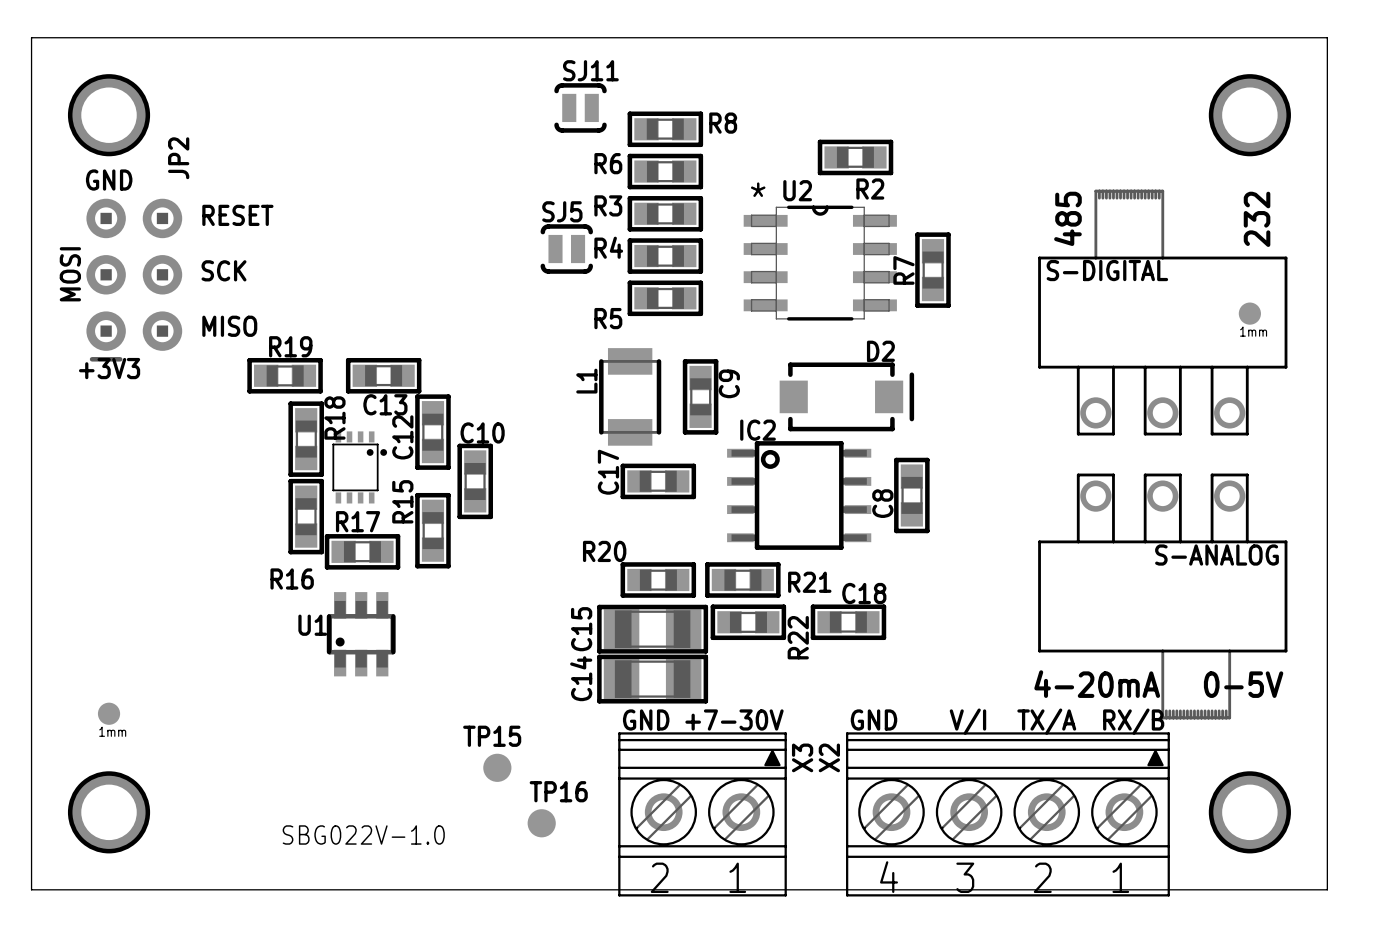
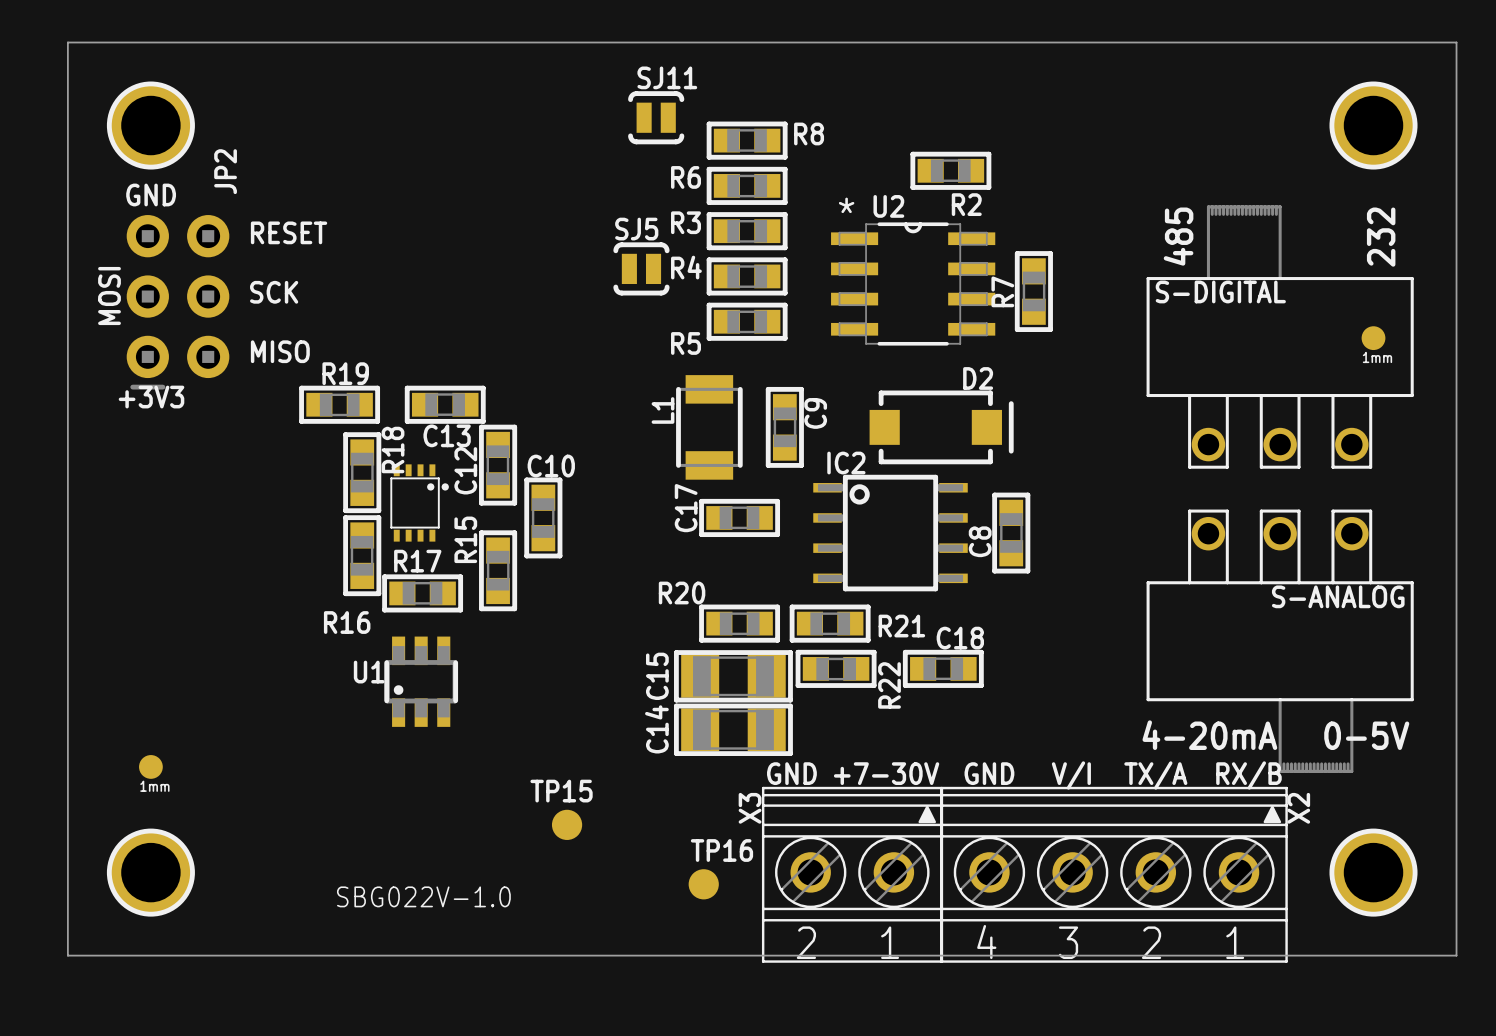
text position: GND (646, 719) -> GND (791, 773)
text: +7-30V (734, 719) -> none
text: GND (874, 719) -> +7-30V (886, 773)
text: none -> GND (989, 773)
X3 name position: X3 (802, 757) -> X3 (750, 808)
X2 name position: X2 (829, 757) -> X2 (1298, 808)
X3 position: (702, 814) -> (852, 874)
TP16 position: (541, 823) -> (703, 884)

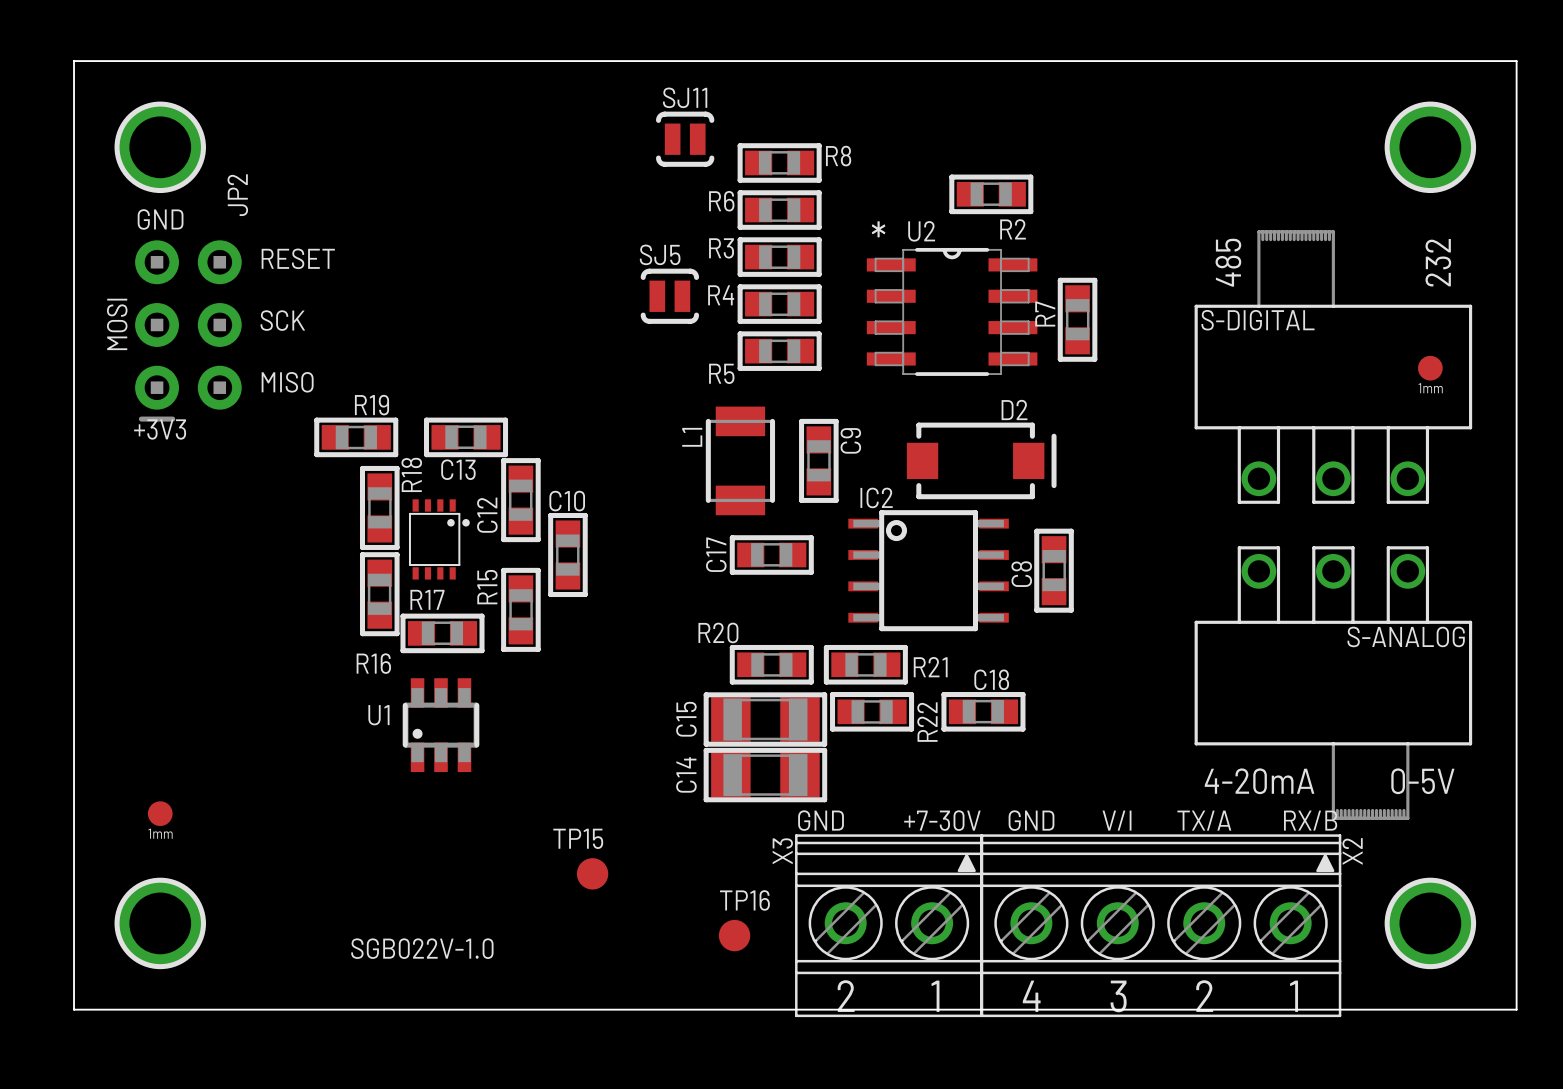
text: SBG022V-1.0 (423, 896) -> SGB022V-1.0 (422, 948)

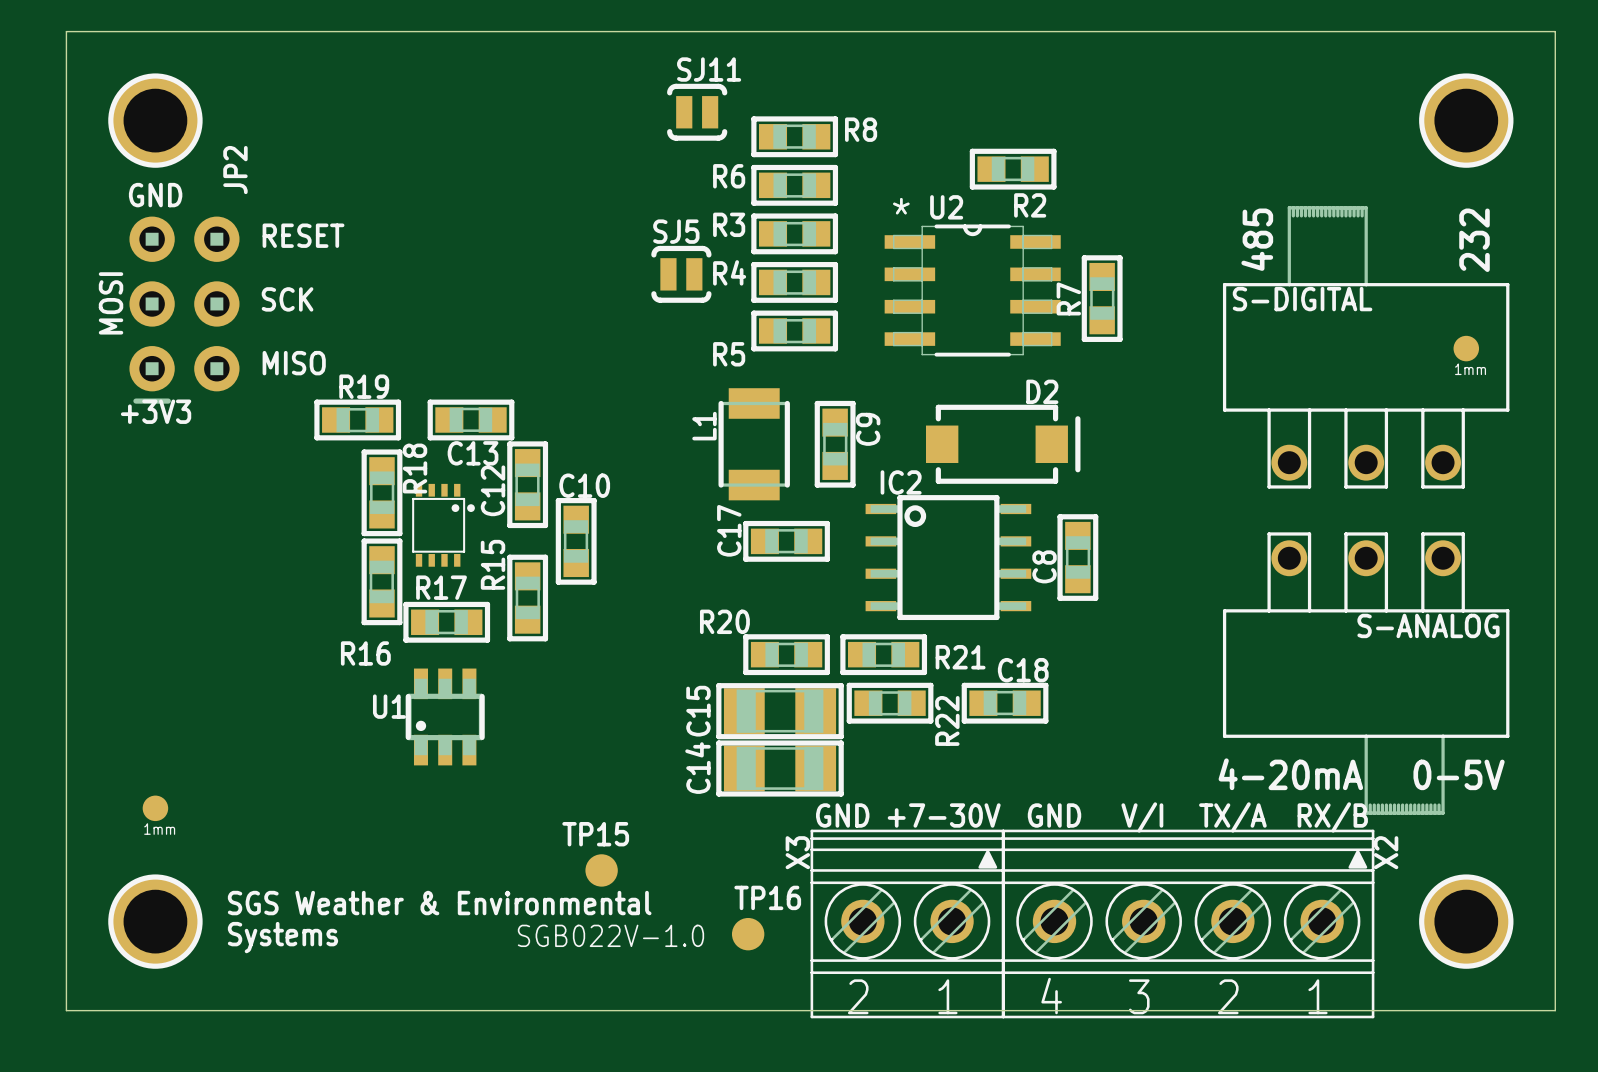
text: none -> SGS Weather & Environmental (439, 903)
text: none -> Systems (282, 937)
text position: SGB022V-1.0 (422, 948) -> SGB022V-1.0 (610, 935)

